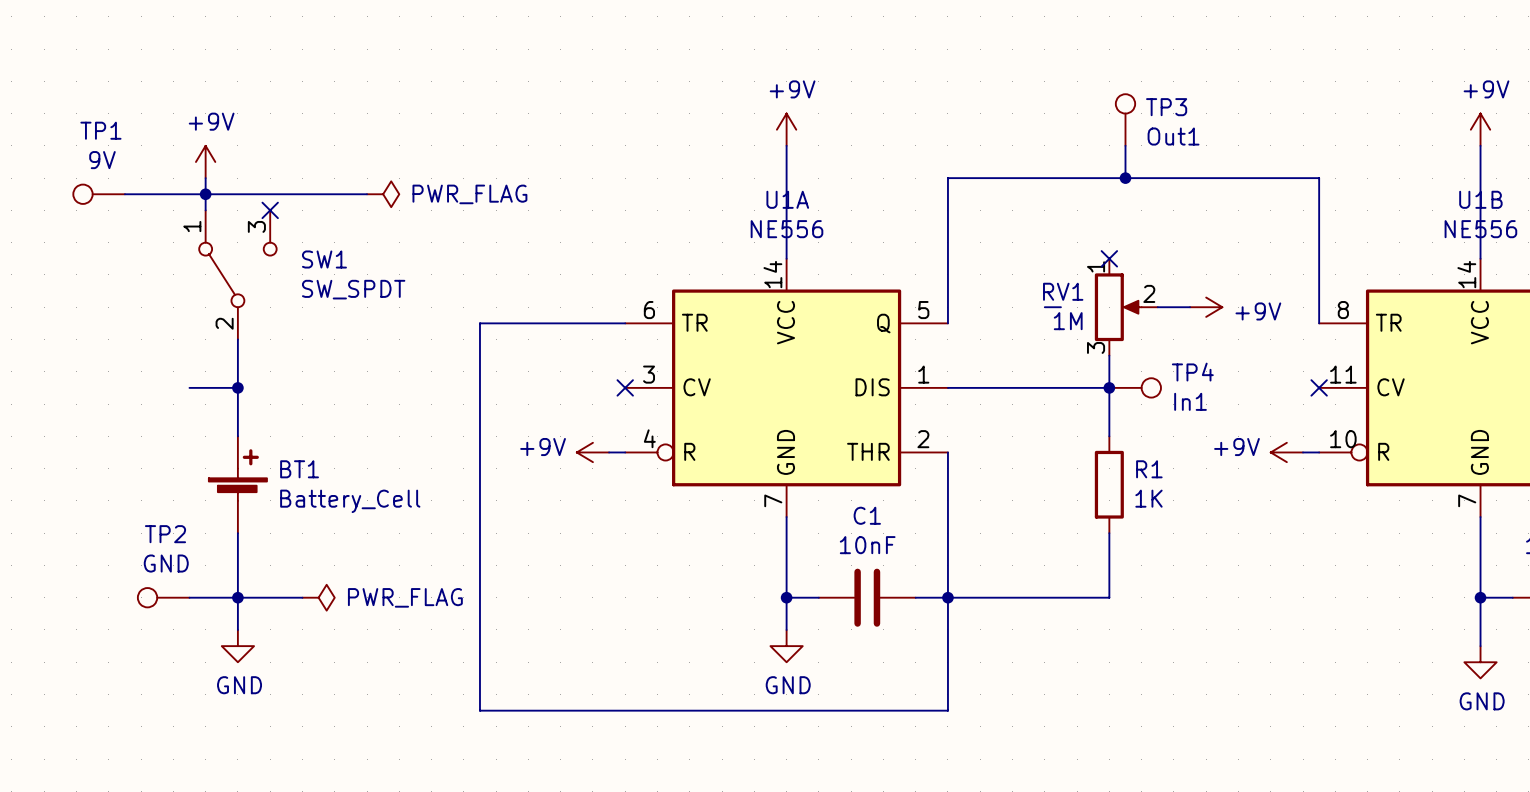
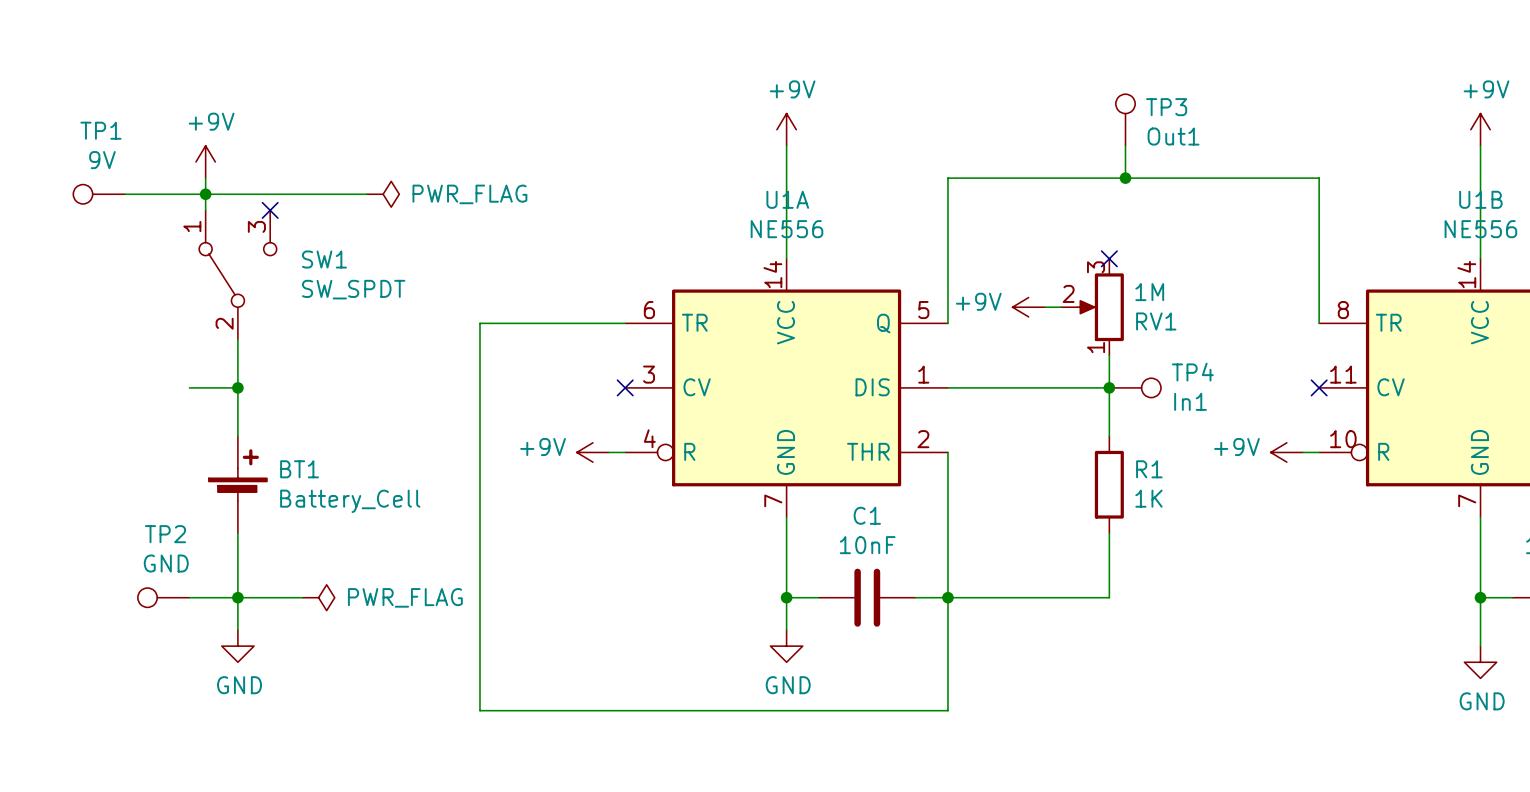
RV1 rotation: 0° (1118, 307) -> 180° (1100, 307)
wire: (1157, 307) (1190, 307) -> none
power symbol rotation: 0° (1206, 307) -> 180° (1028, 307)
power symbol position: +9V (1206, 307) -> +9V (1028, 307)

